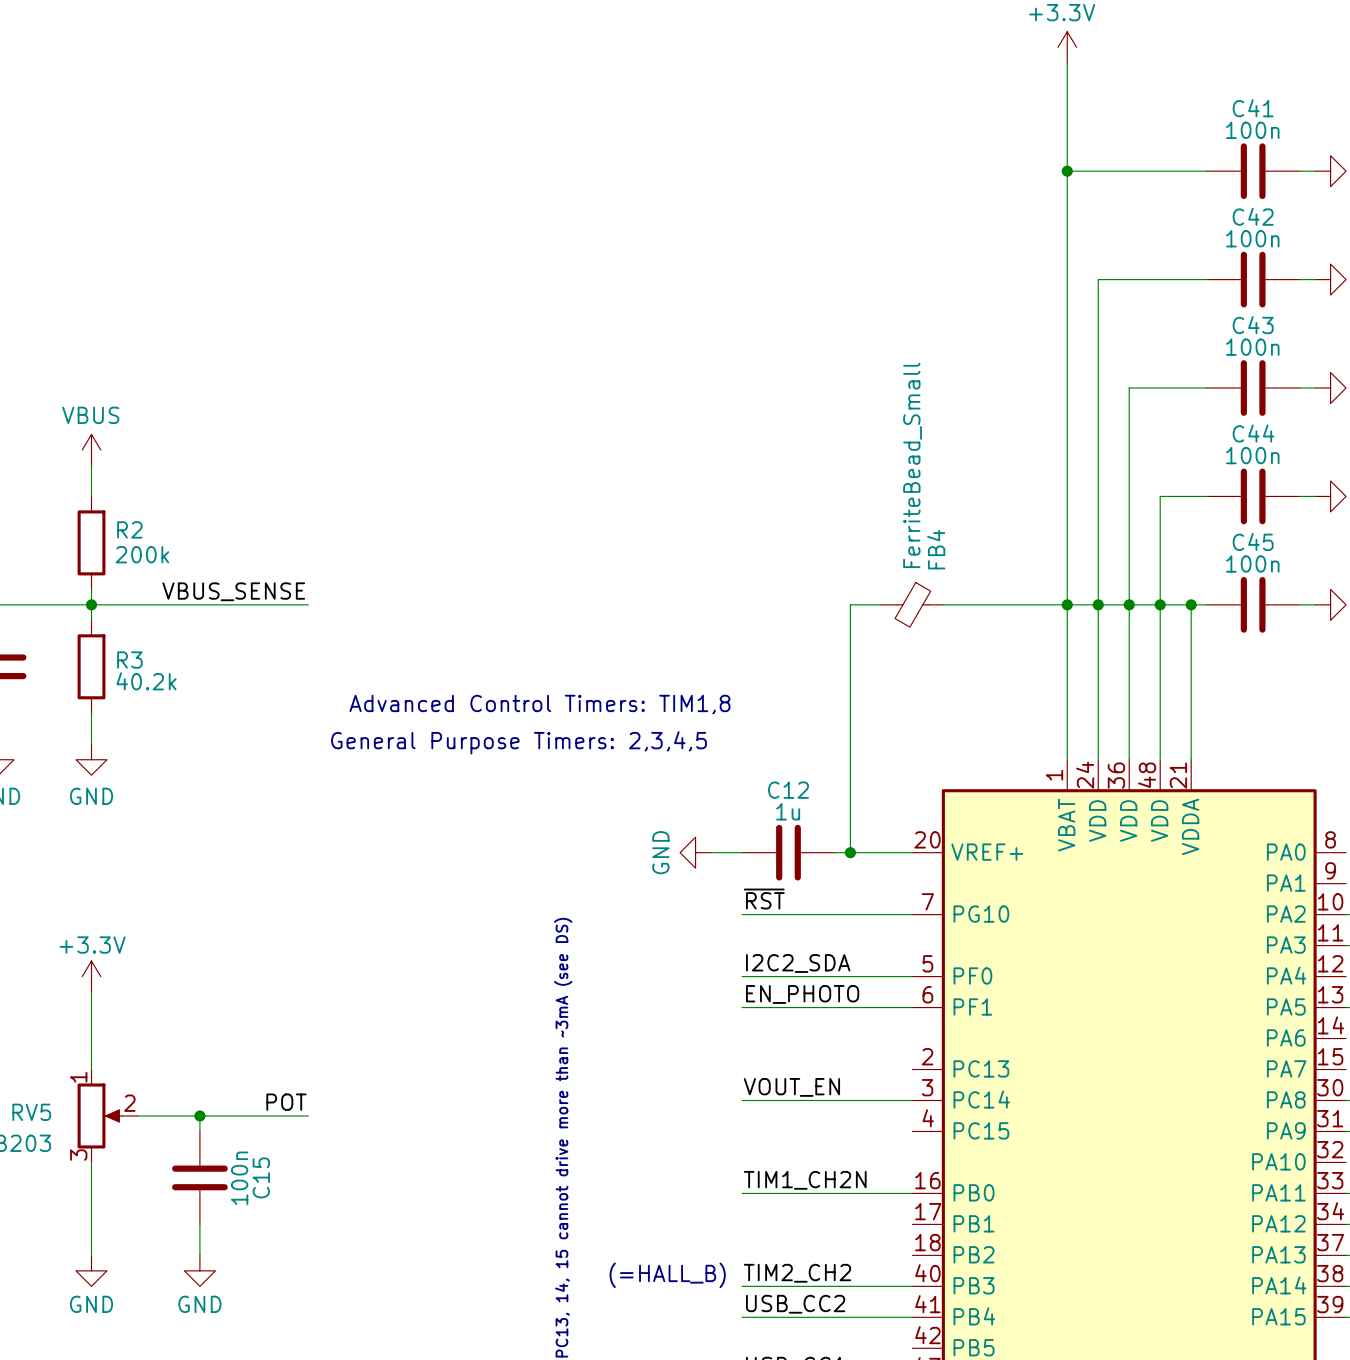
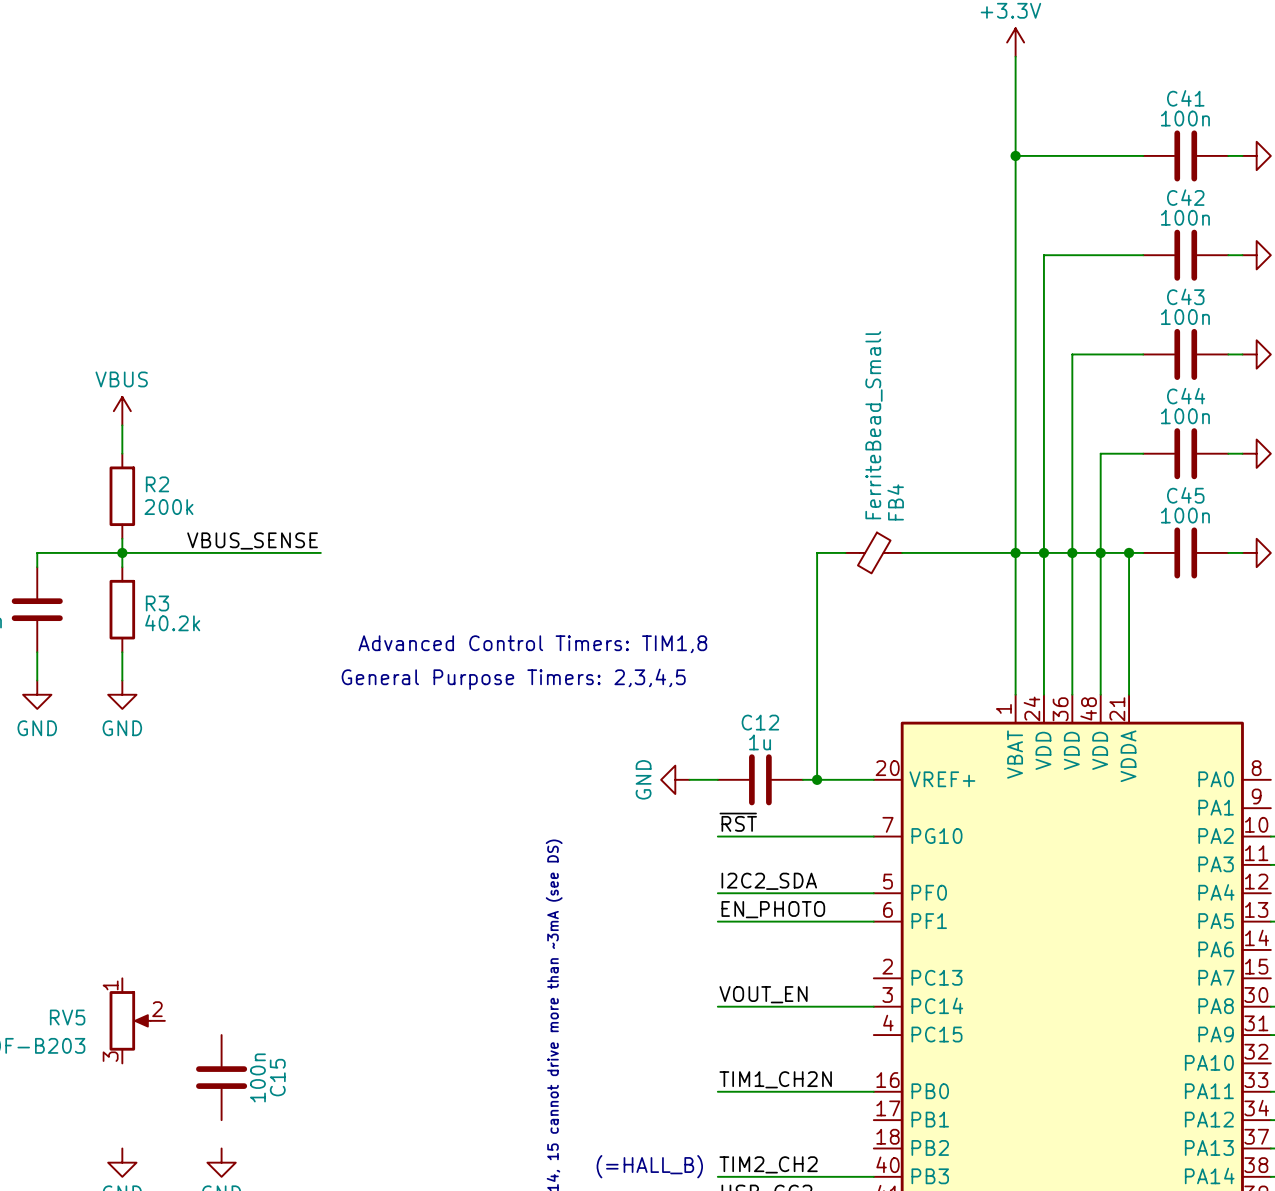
power symbol: +3.3V (91, 976) -> none
wire: (91, 992) (91, 1069) -> none
label: POT (286, 1102) -> none
wire: (137, 1115) (308, 1115) -> none
wire: (199, 1115) (199, 1131) -> none
junction: (199, 1115) -> none
wire: (91, 1162) (91, 1255) -> none
wire: (199, 1224) (199, 1255) -> none

